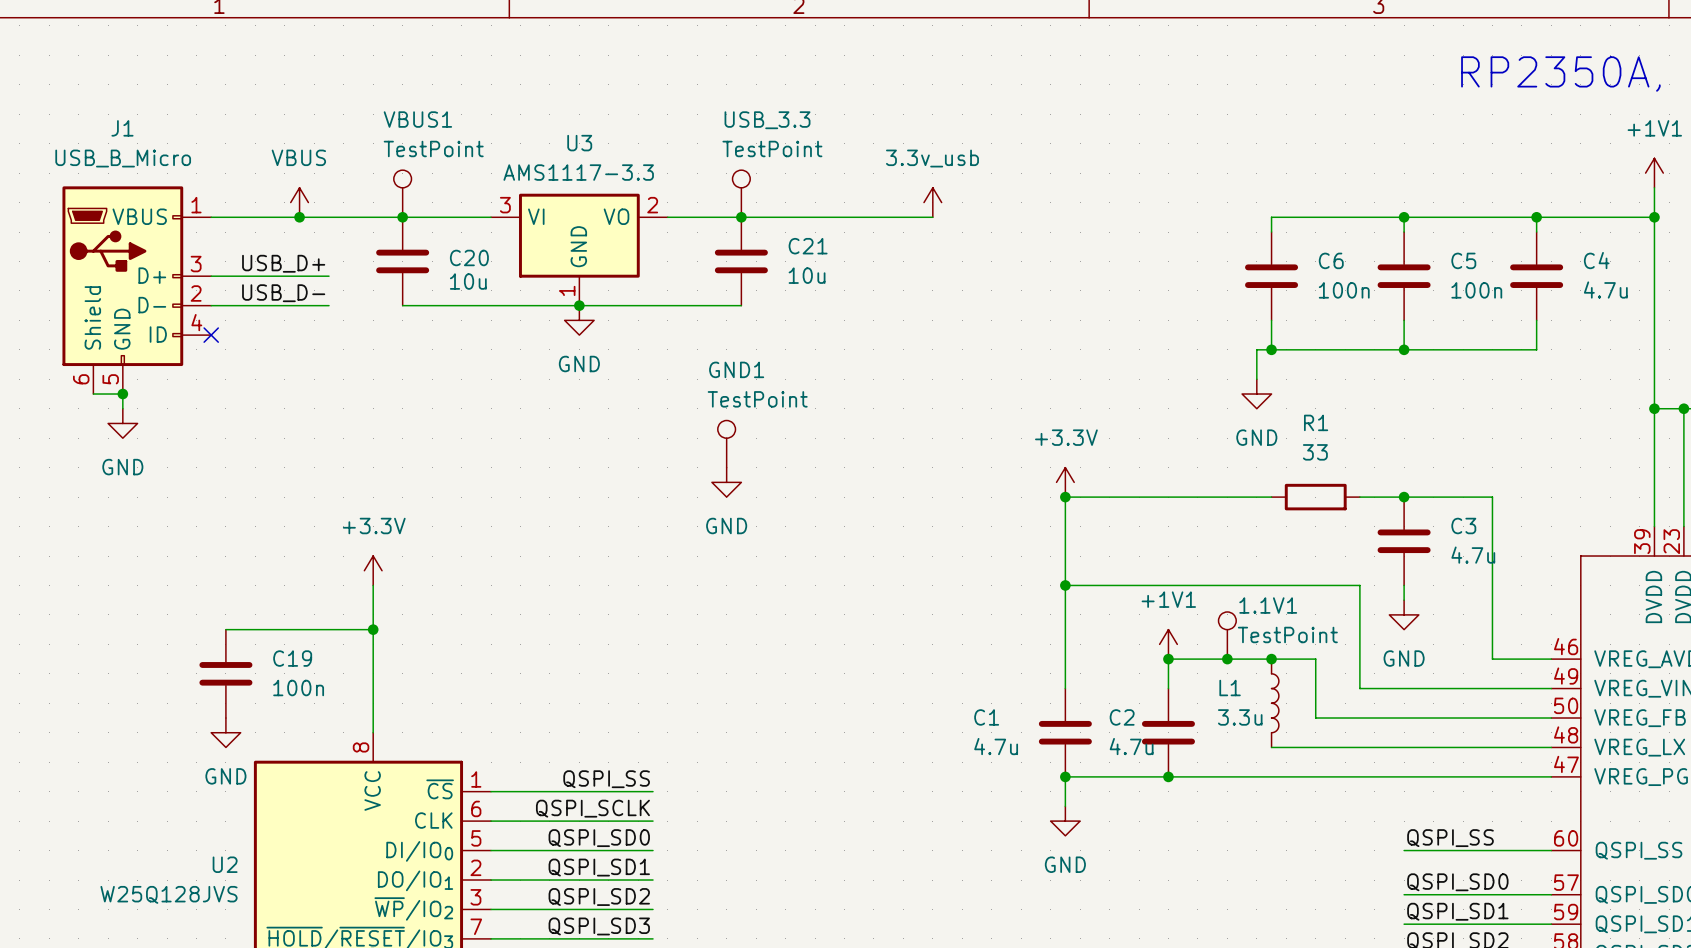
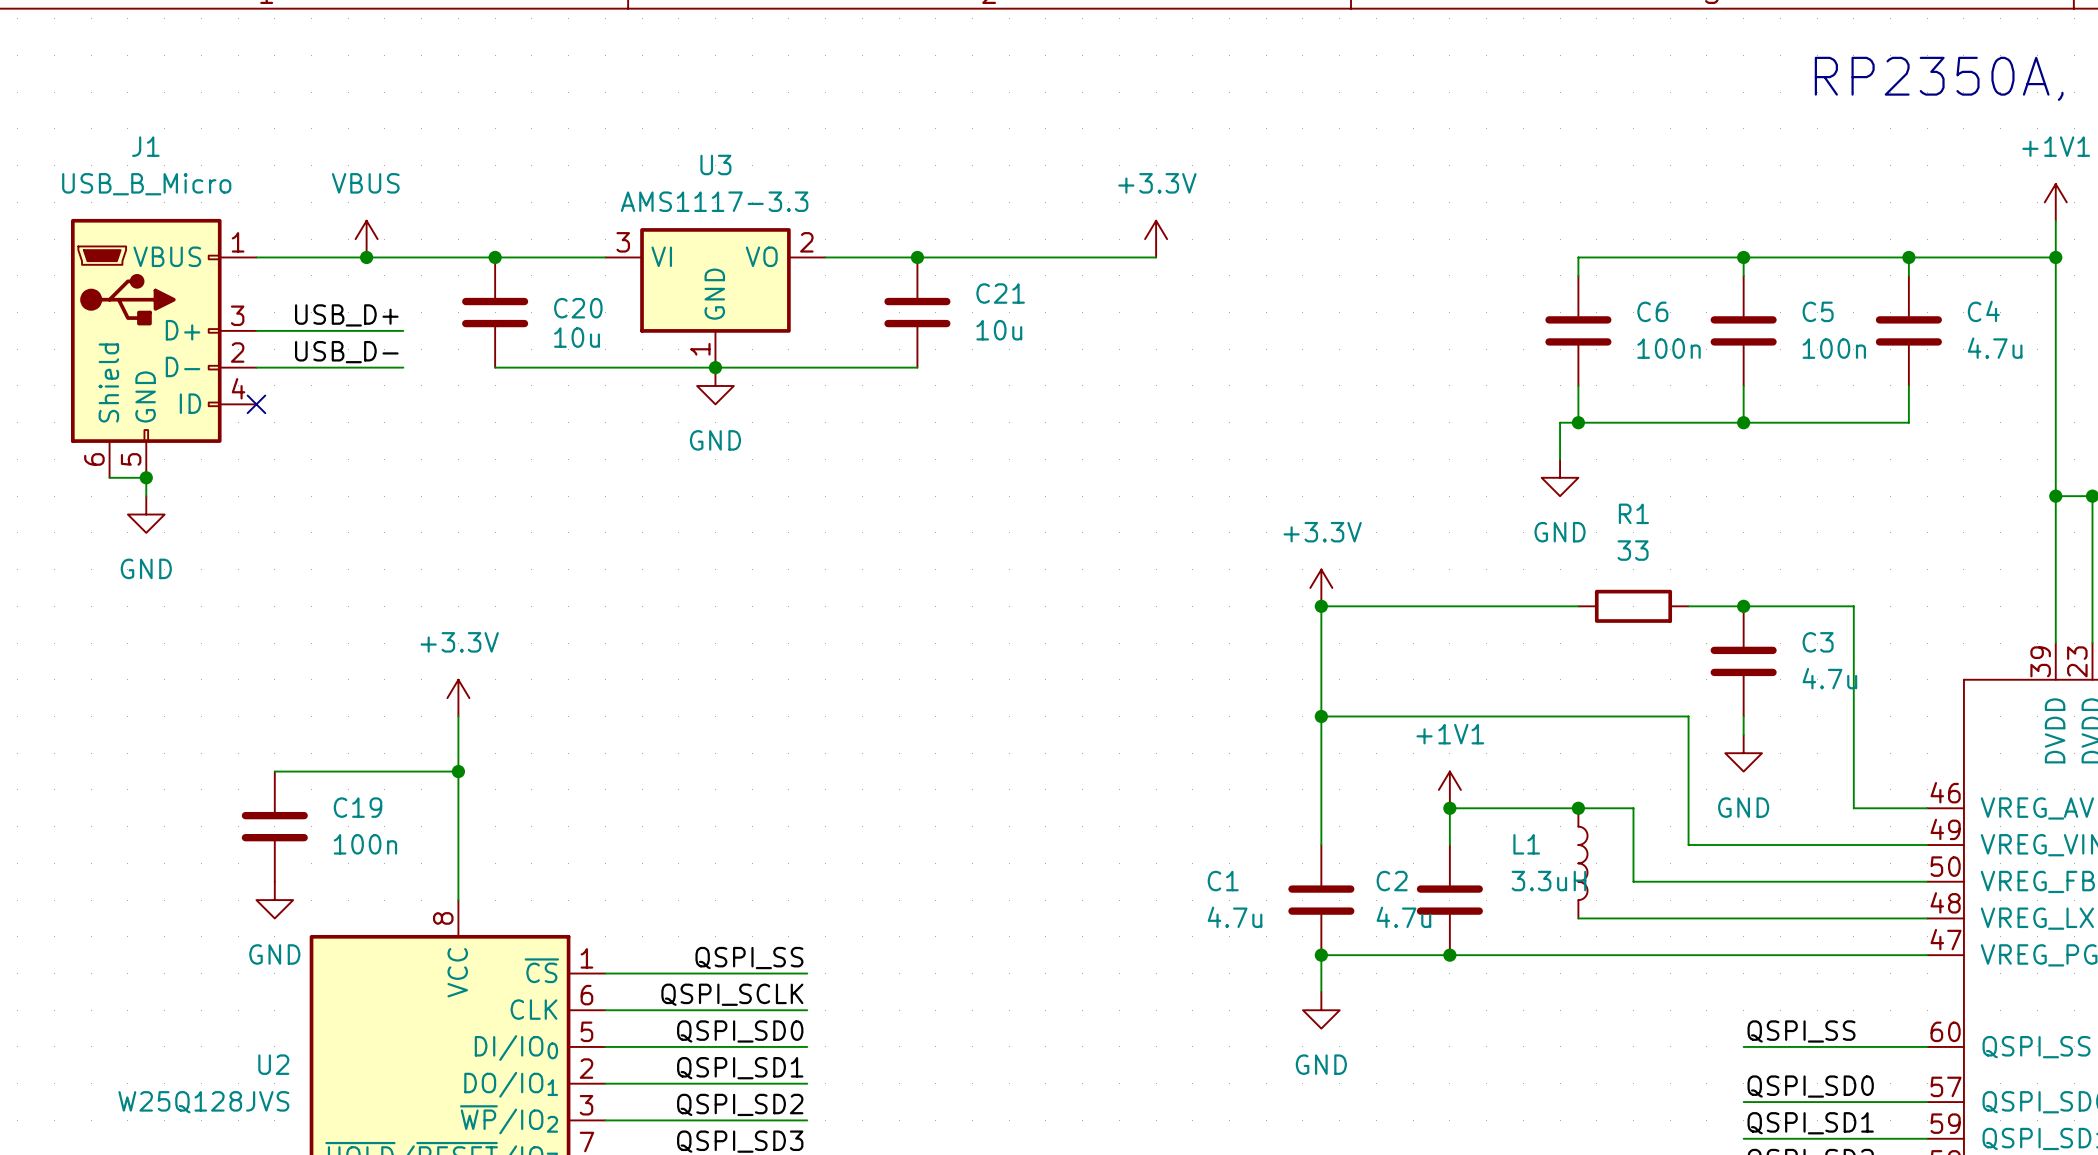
VBUS1: TestPoint (402, 193) -> none
USB_3.3: TestPoint (741, 193) -> none
power symbol: 3.3v_usb (932, 202) -> +3.3V (1156, 239)
GND1: TestPoint (726, 444) -> none
power symbol: GND (726, 482) -> none
1.1V1: TestPoint (1227, 635) -> none
junction: (1227, 659) -> none
L1 value: 3.3u (1240, 717) -> 3.3uH (1548, 881)

